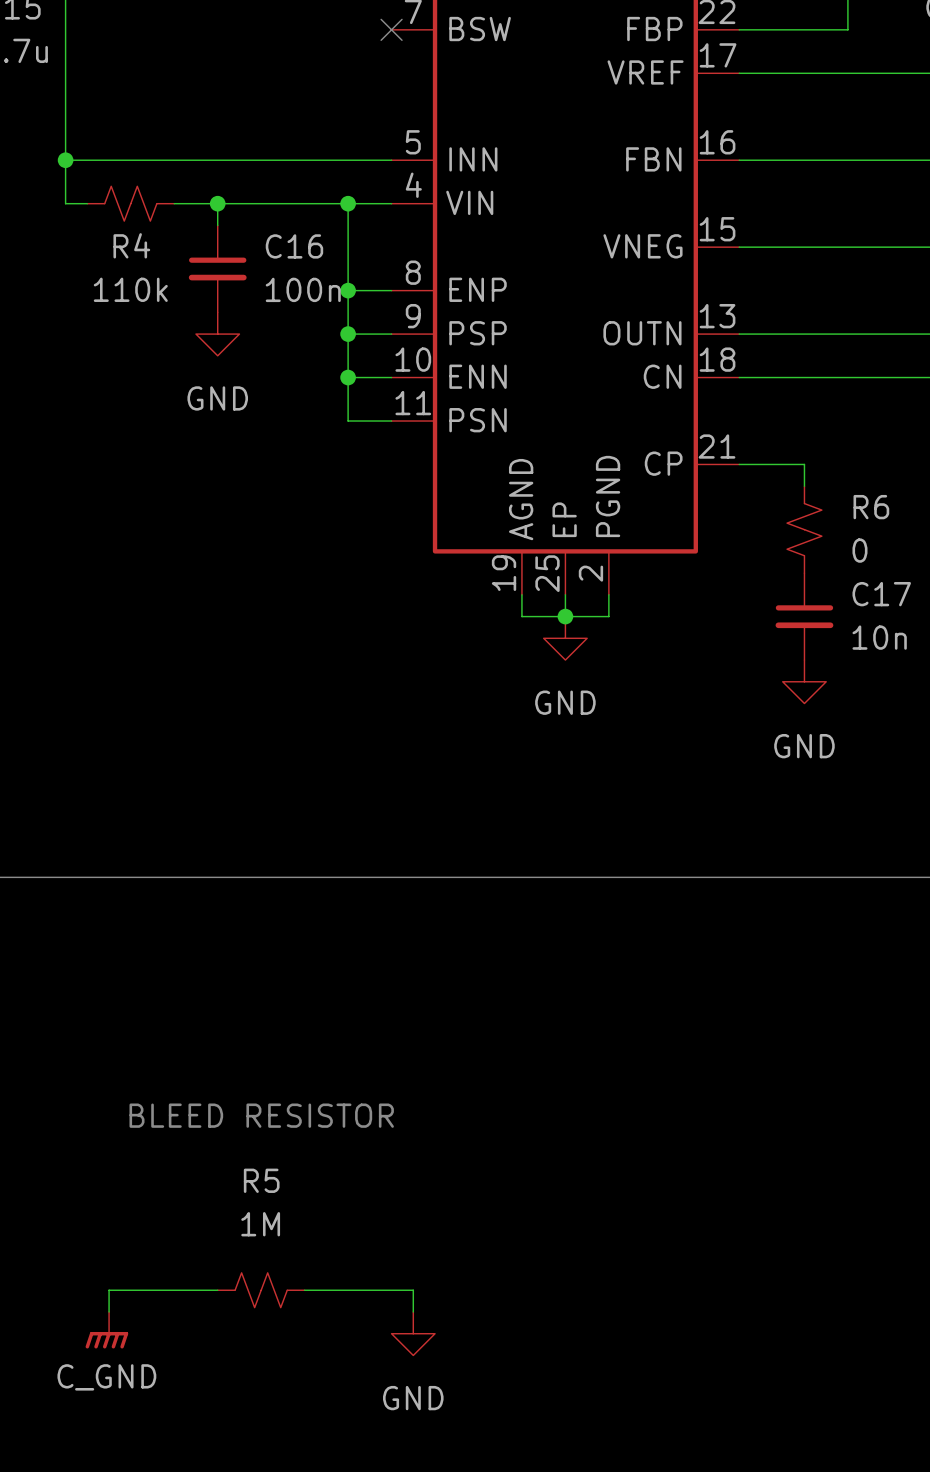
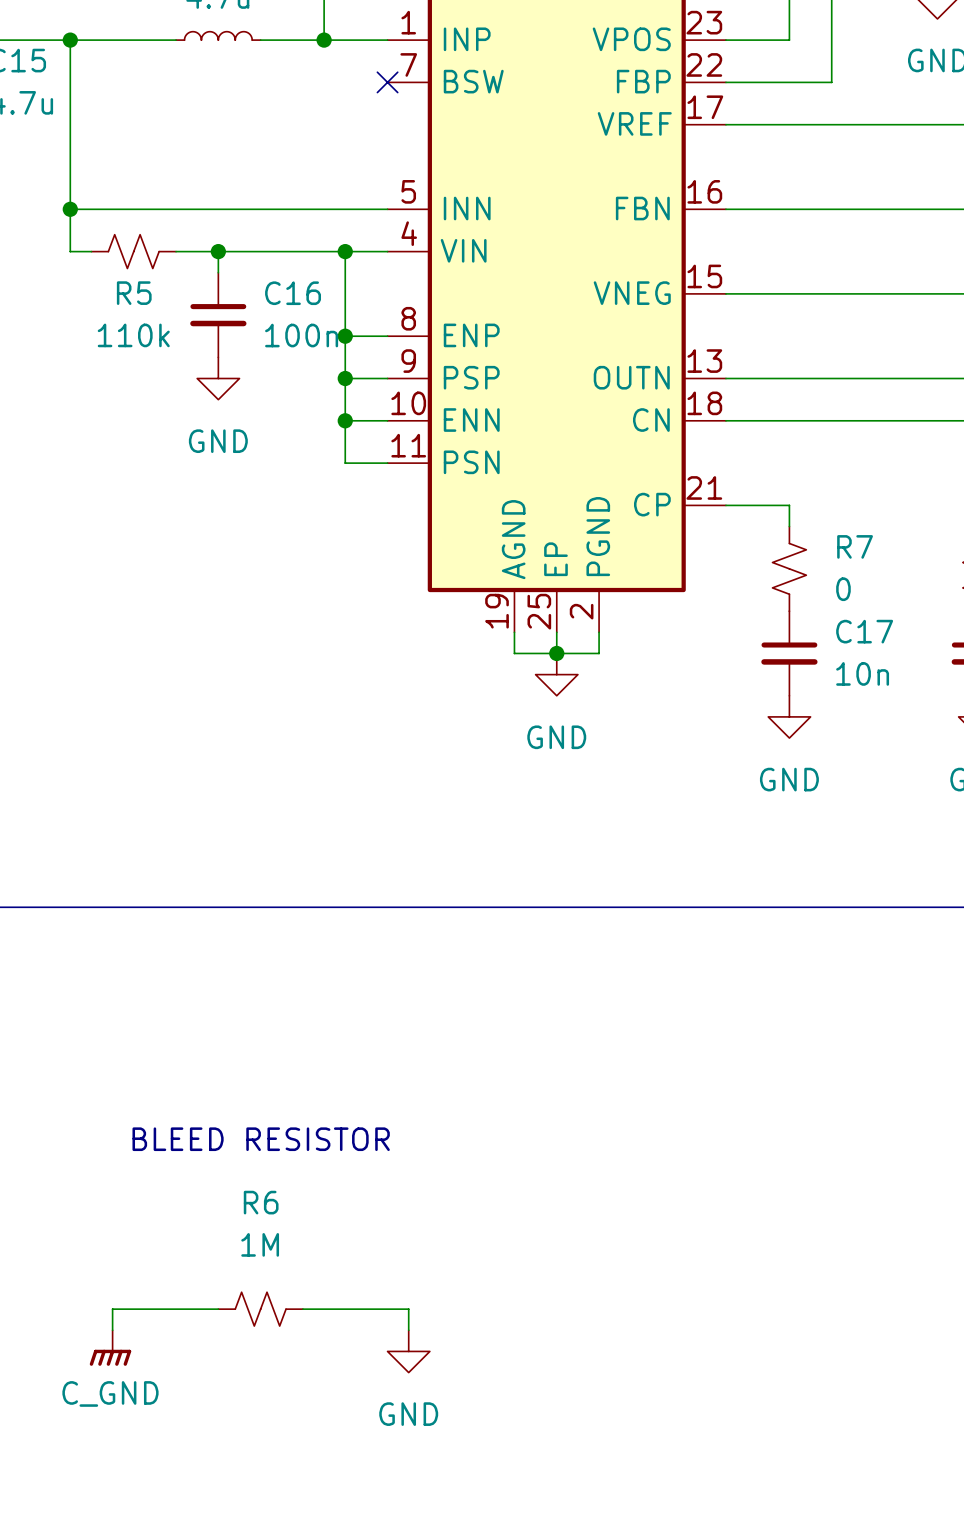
R4 name: R4 (131, 245) -> R5 (134, 293)
R6 name: R6 (871, 507) -> R7 (855, 546)
R5 name: R5 (261, 1180) -> R6 (261, 1202)

